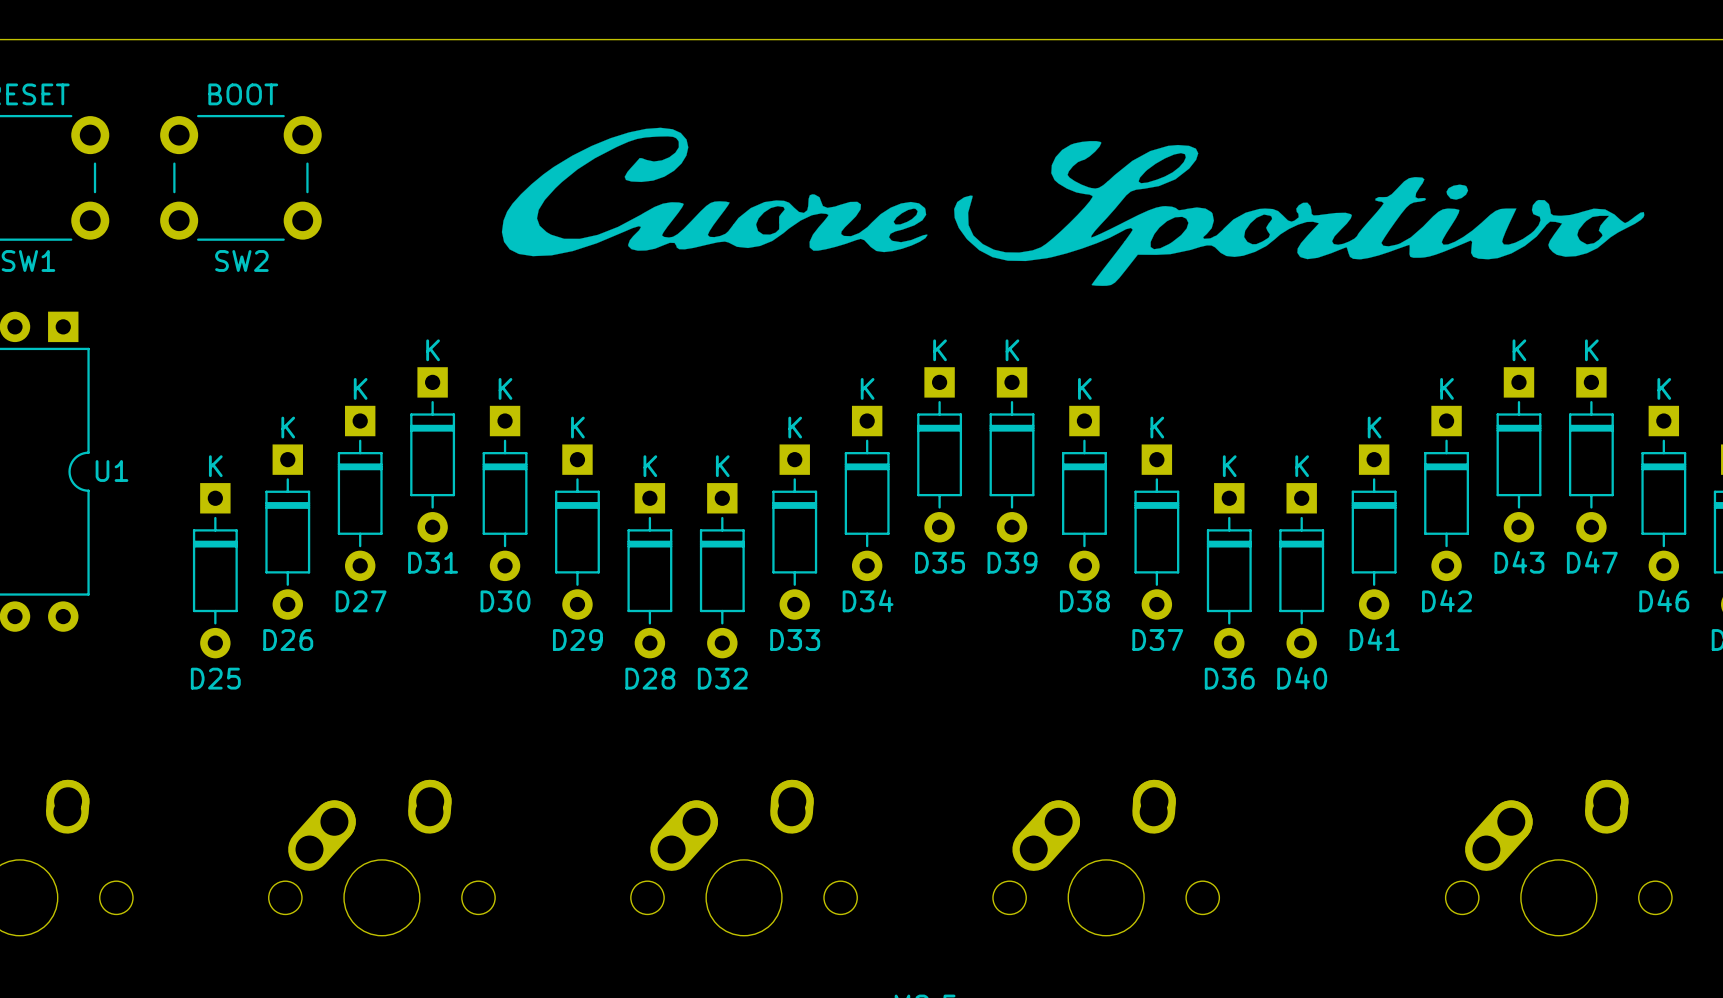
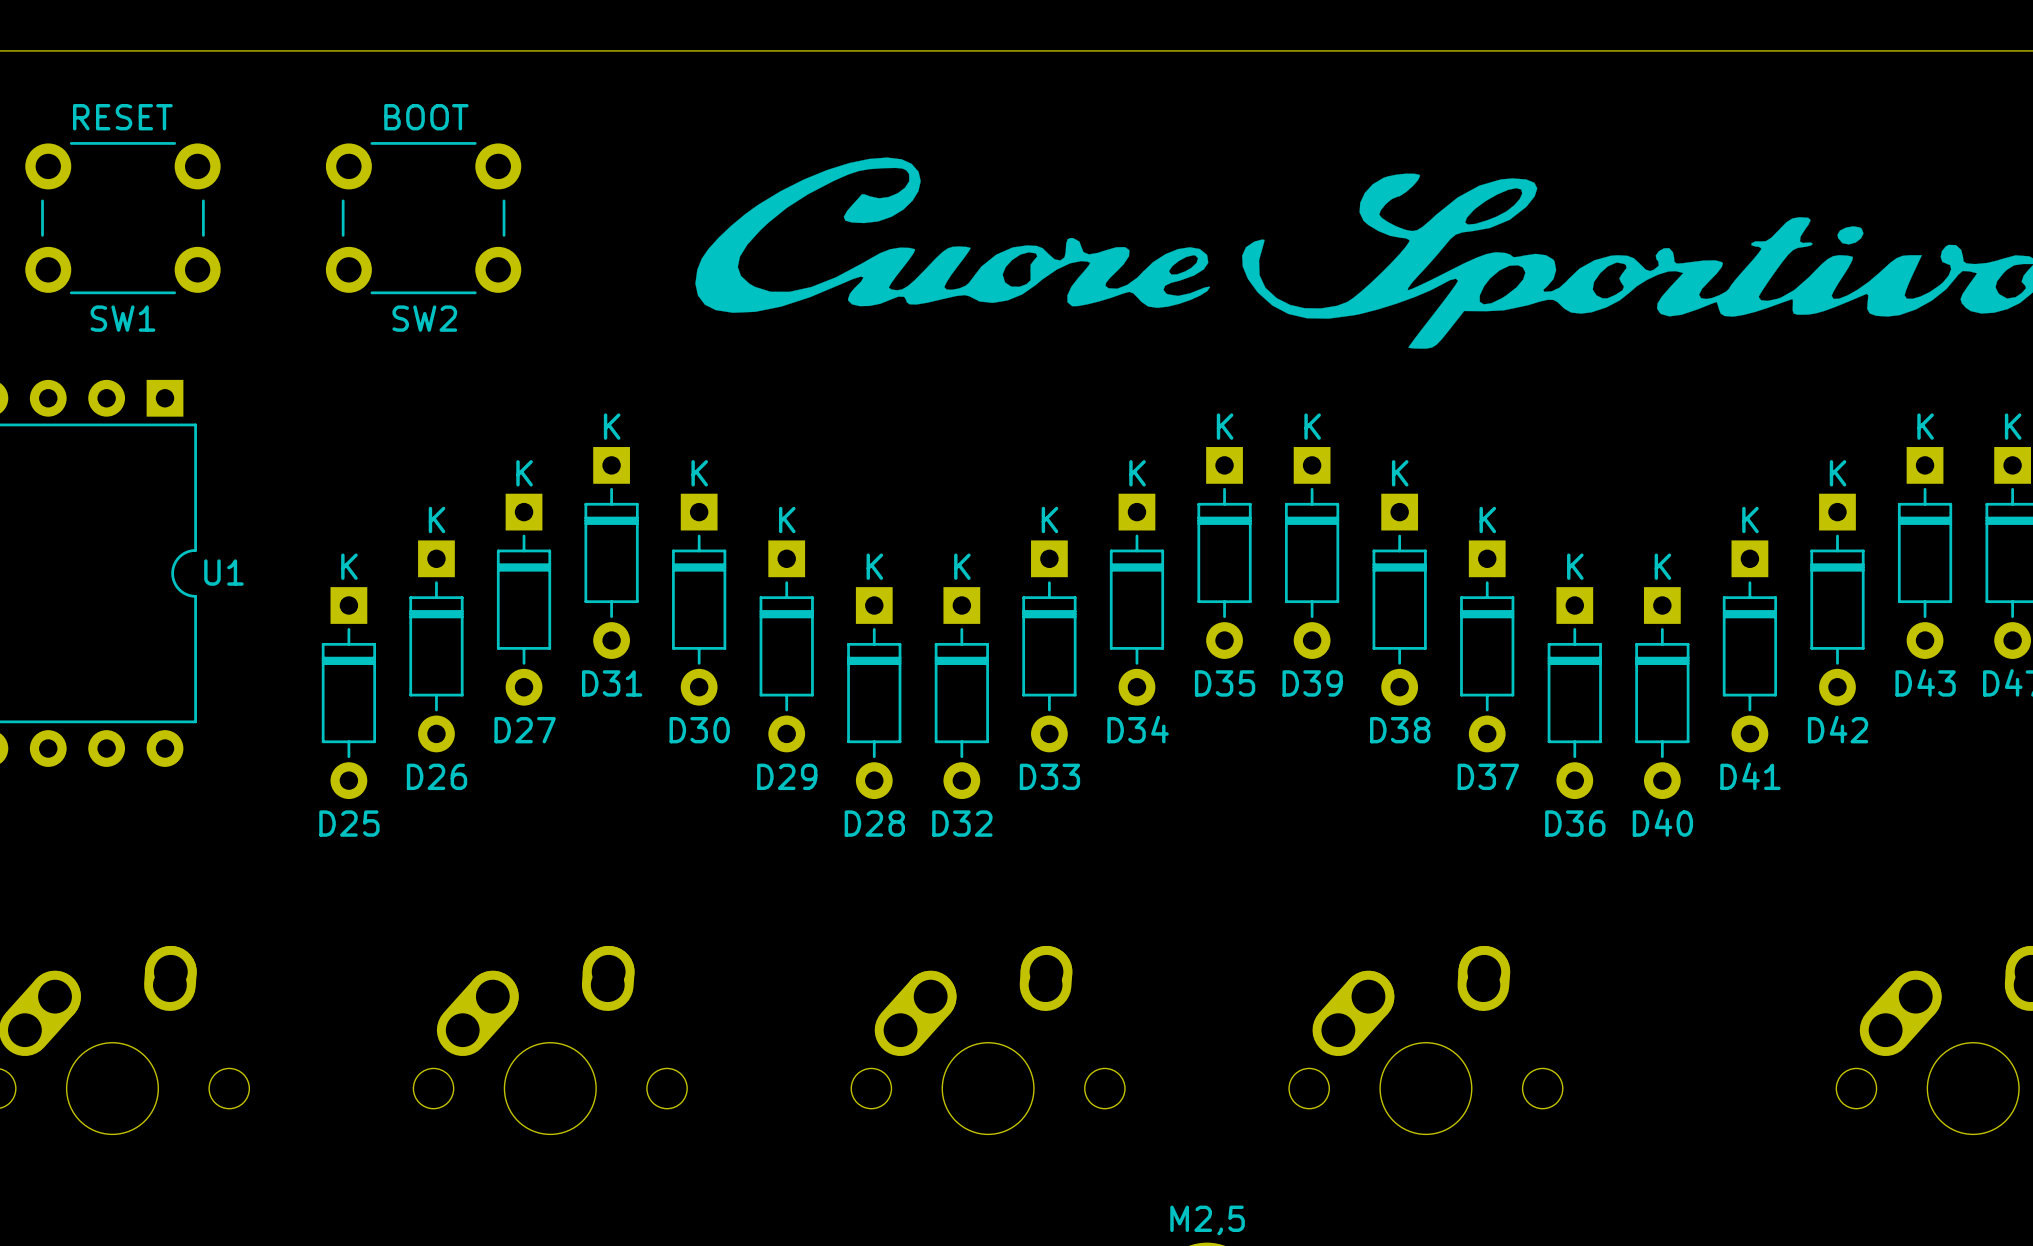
text position: BOOT (243, 94) -> BOOT (426, 117)
SW2 position: (240, 177) -> (423, 218)

